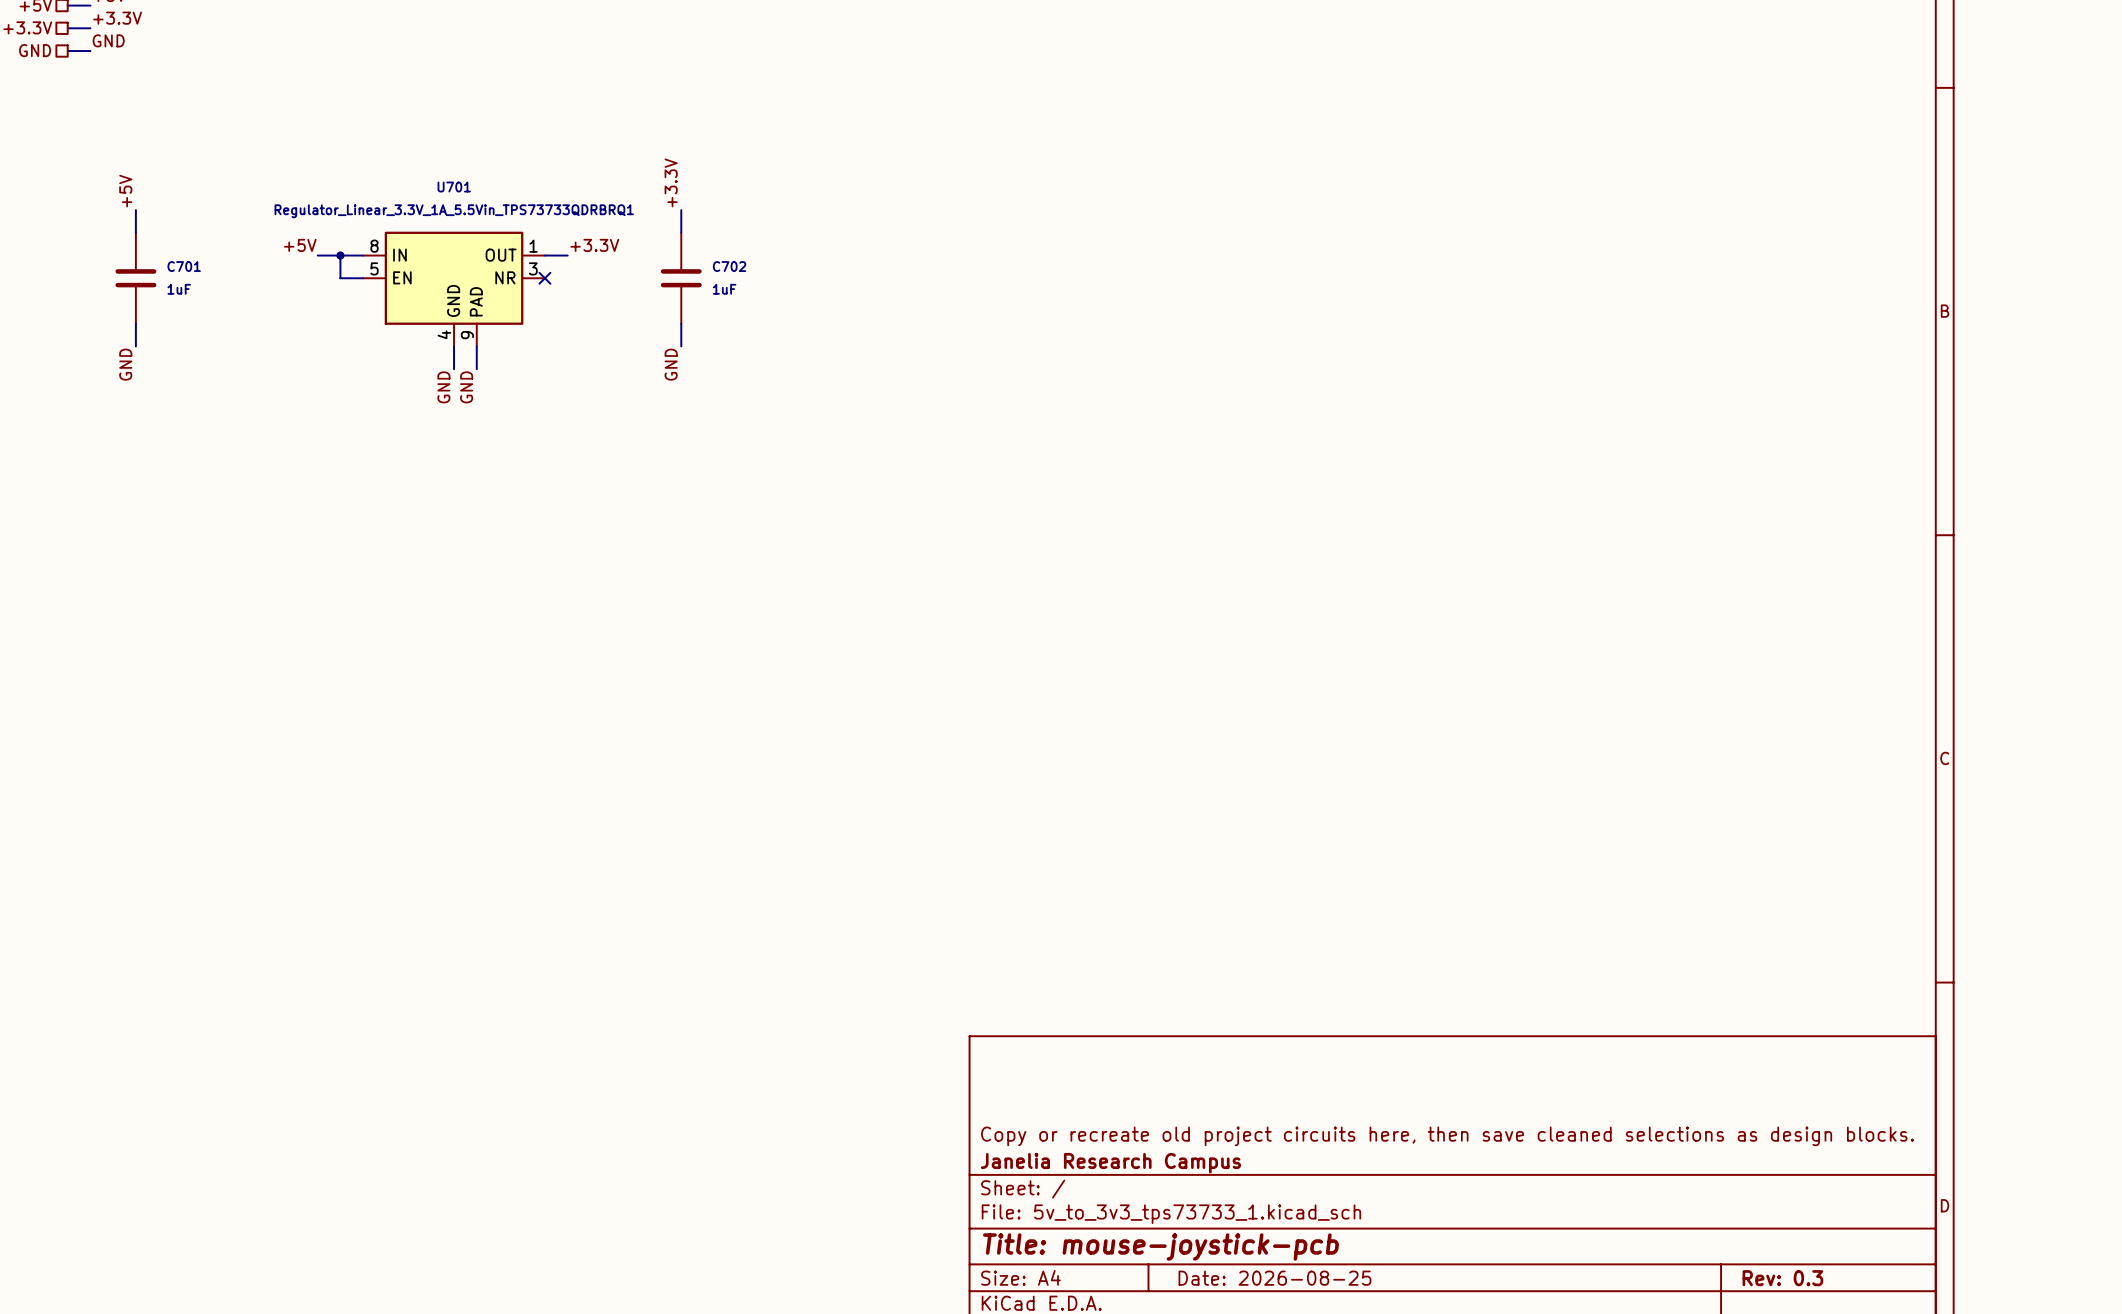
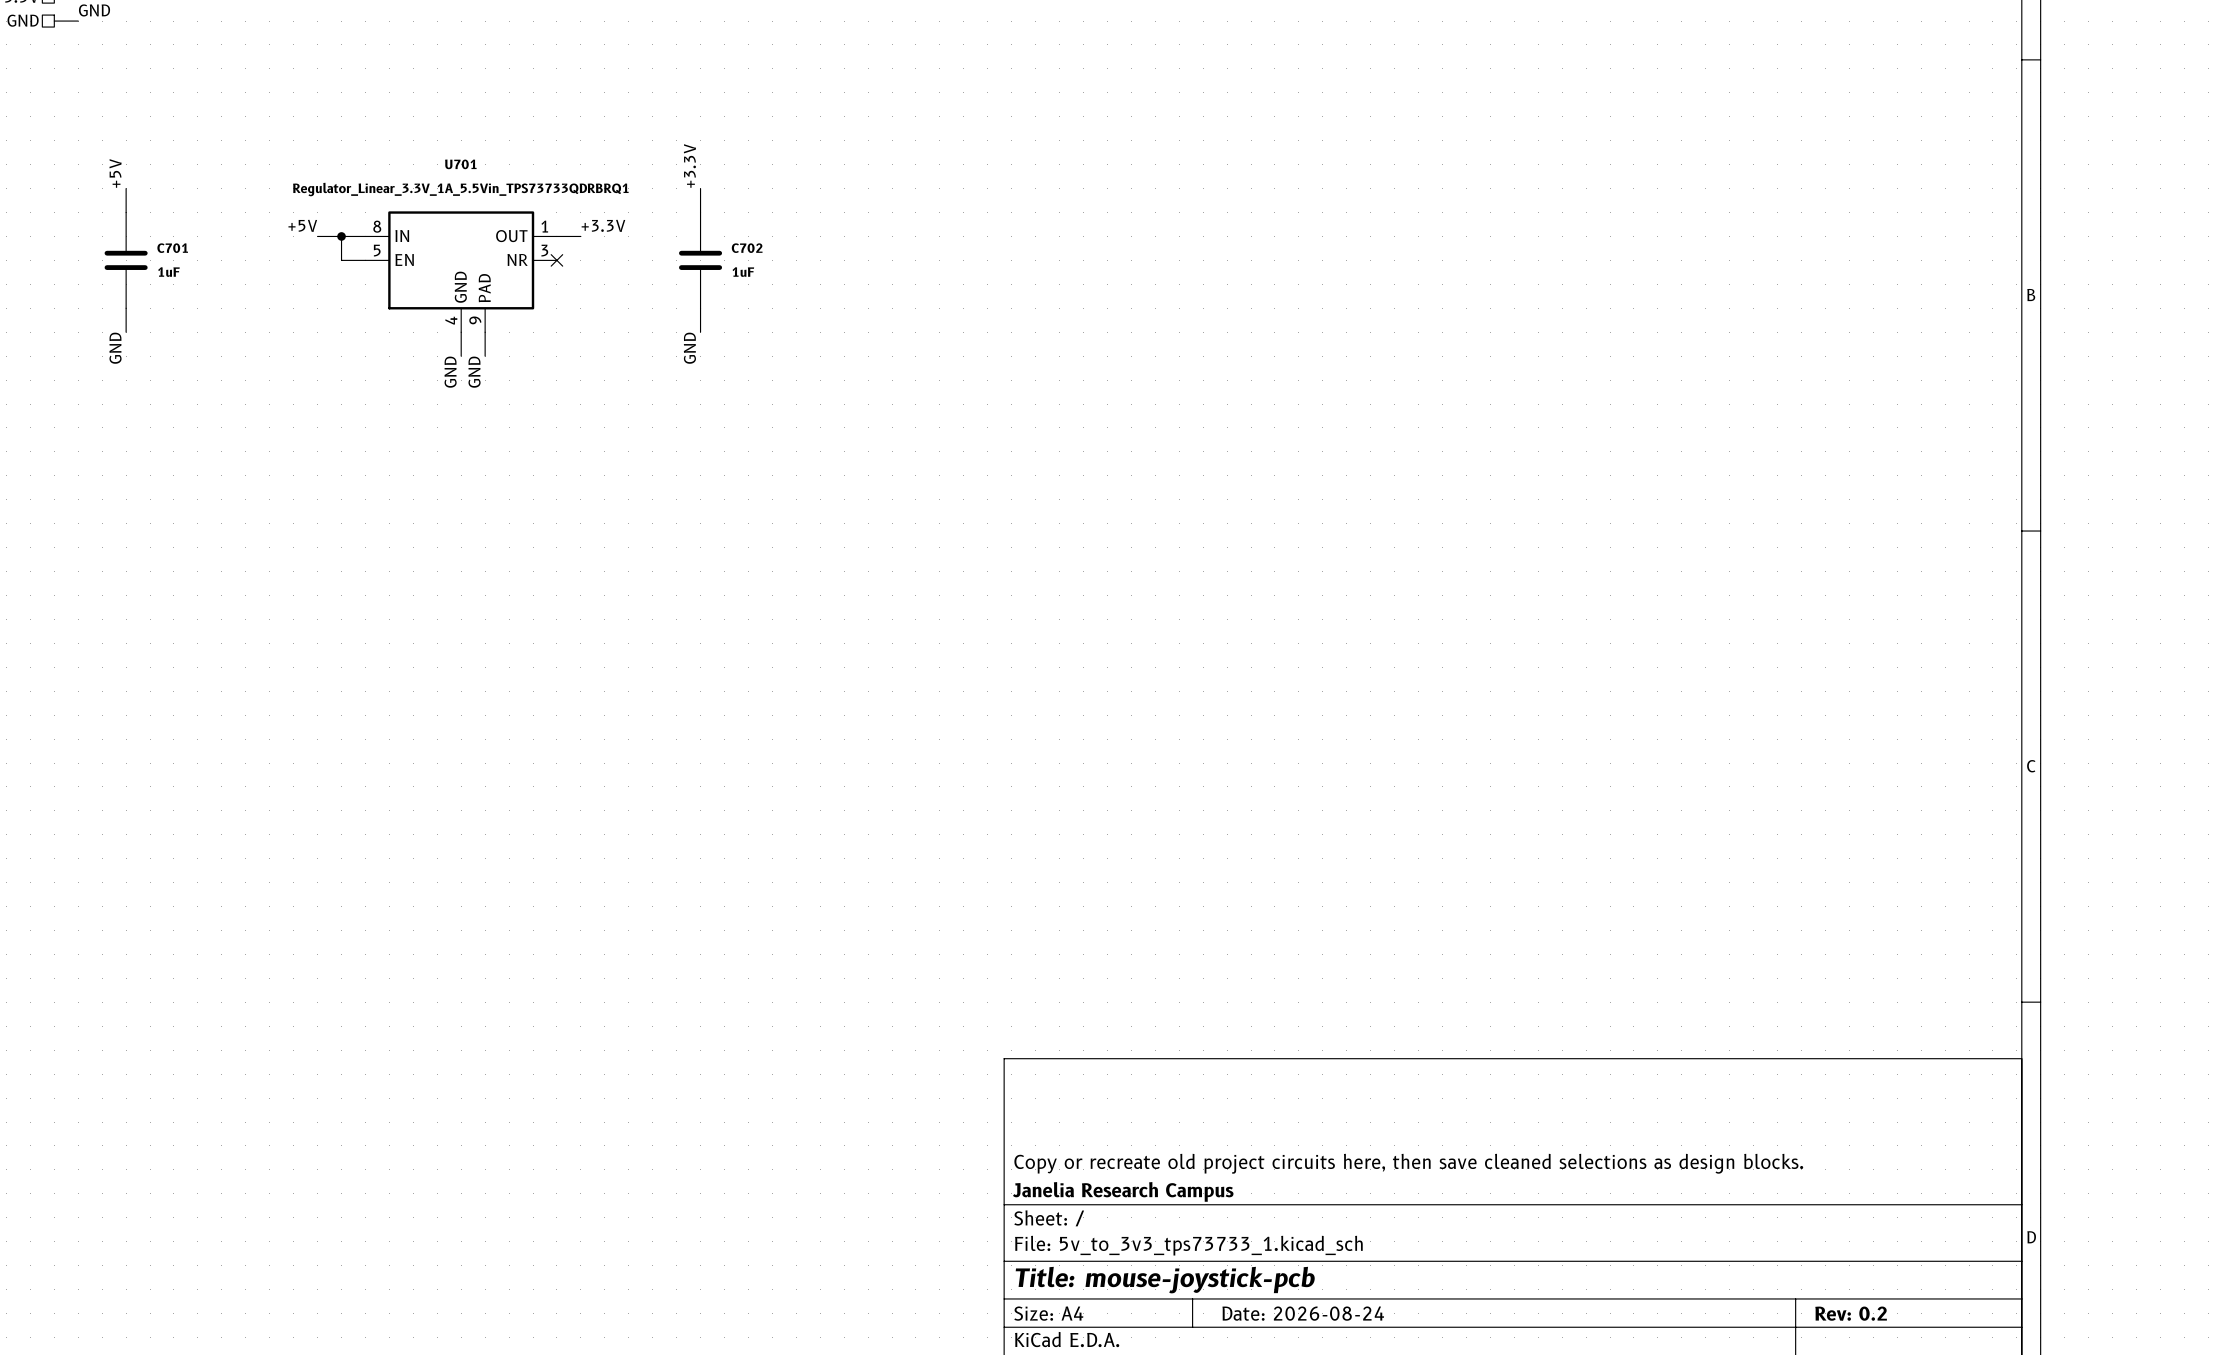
title block: Date: 2026-08-25 (1274, 1278) -> Date: 2026-08-24 (1303, 1313)
title block: Rev: 0.3 (1782, 1278) -> Rev: 0.2 (1851, 1313)

